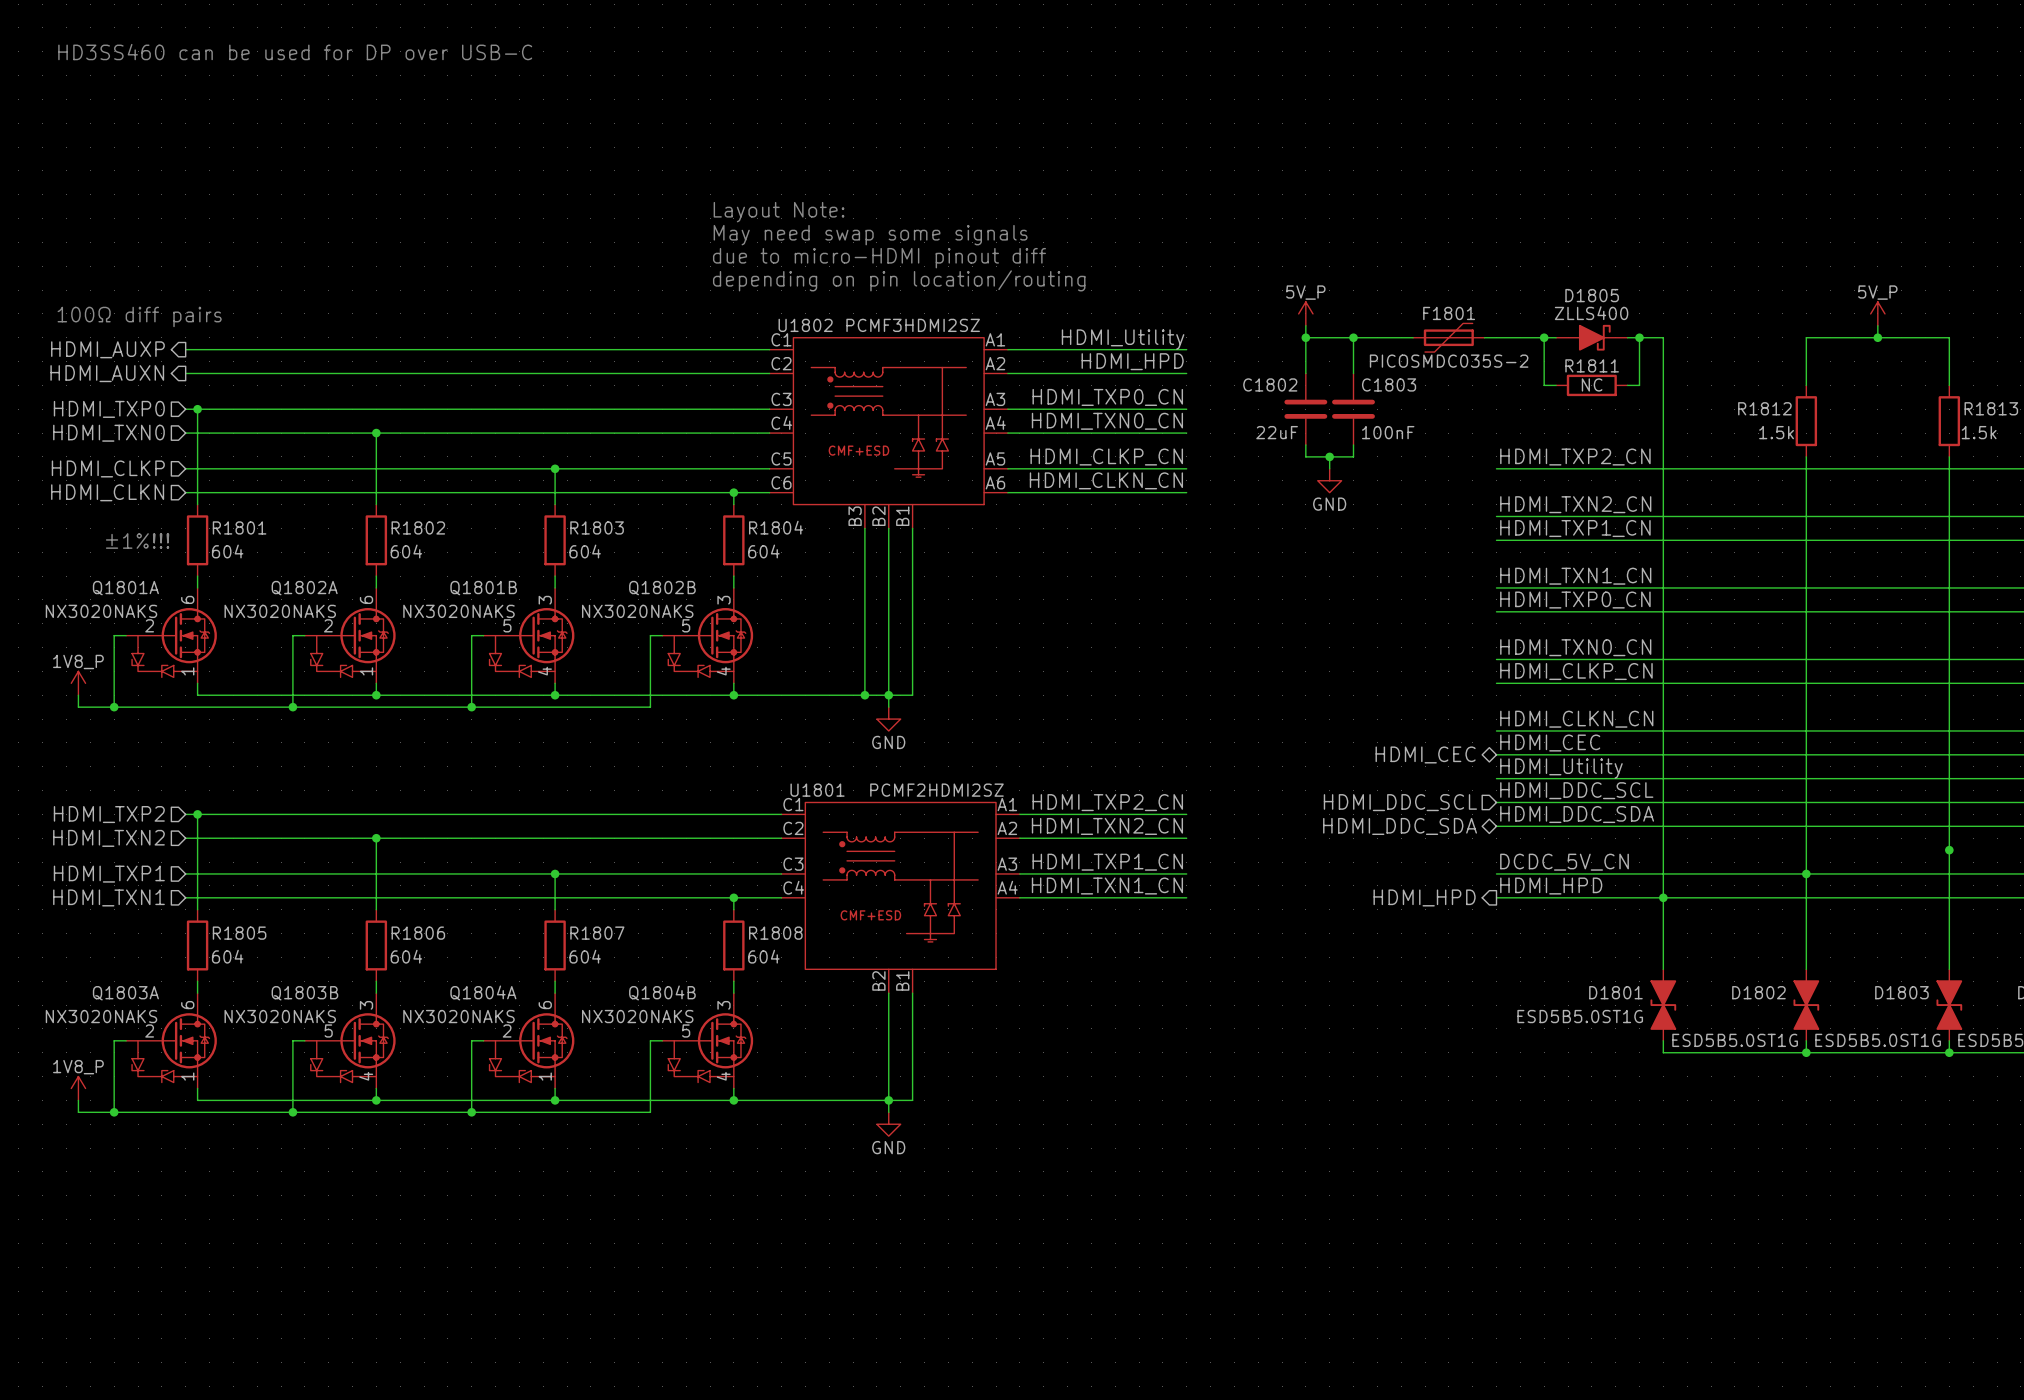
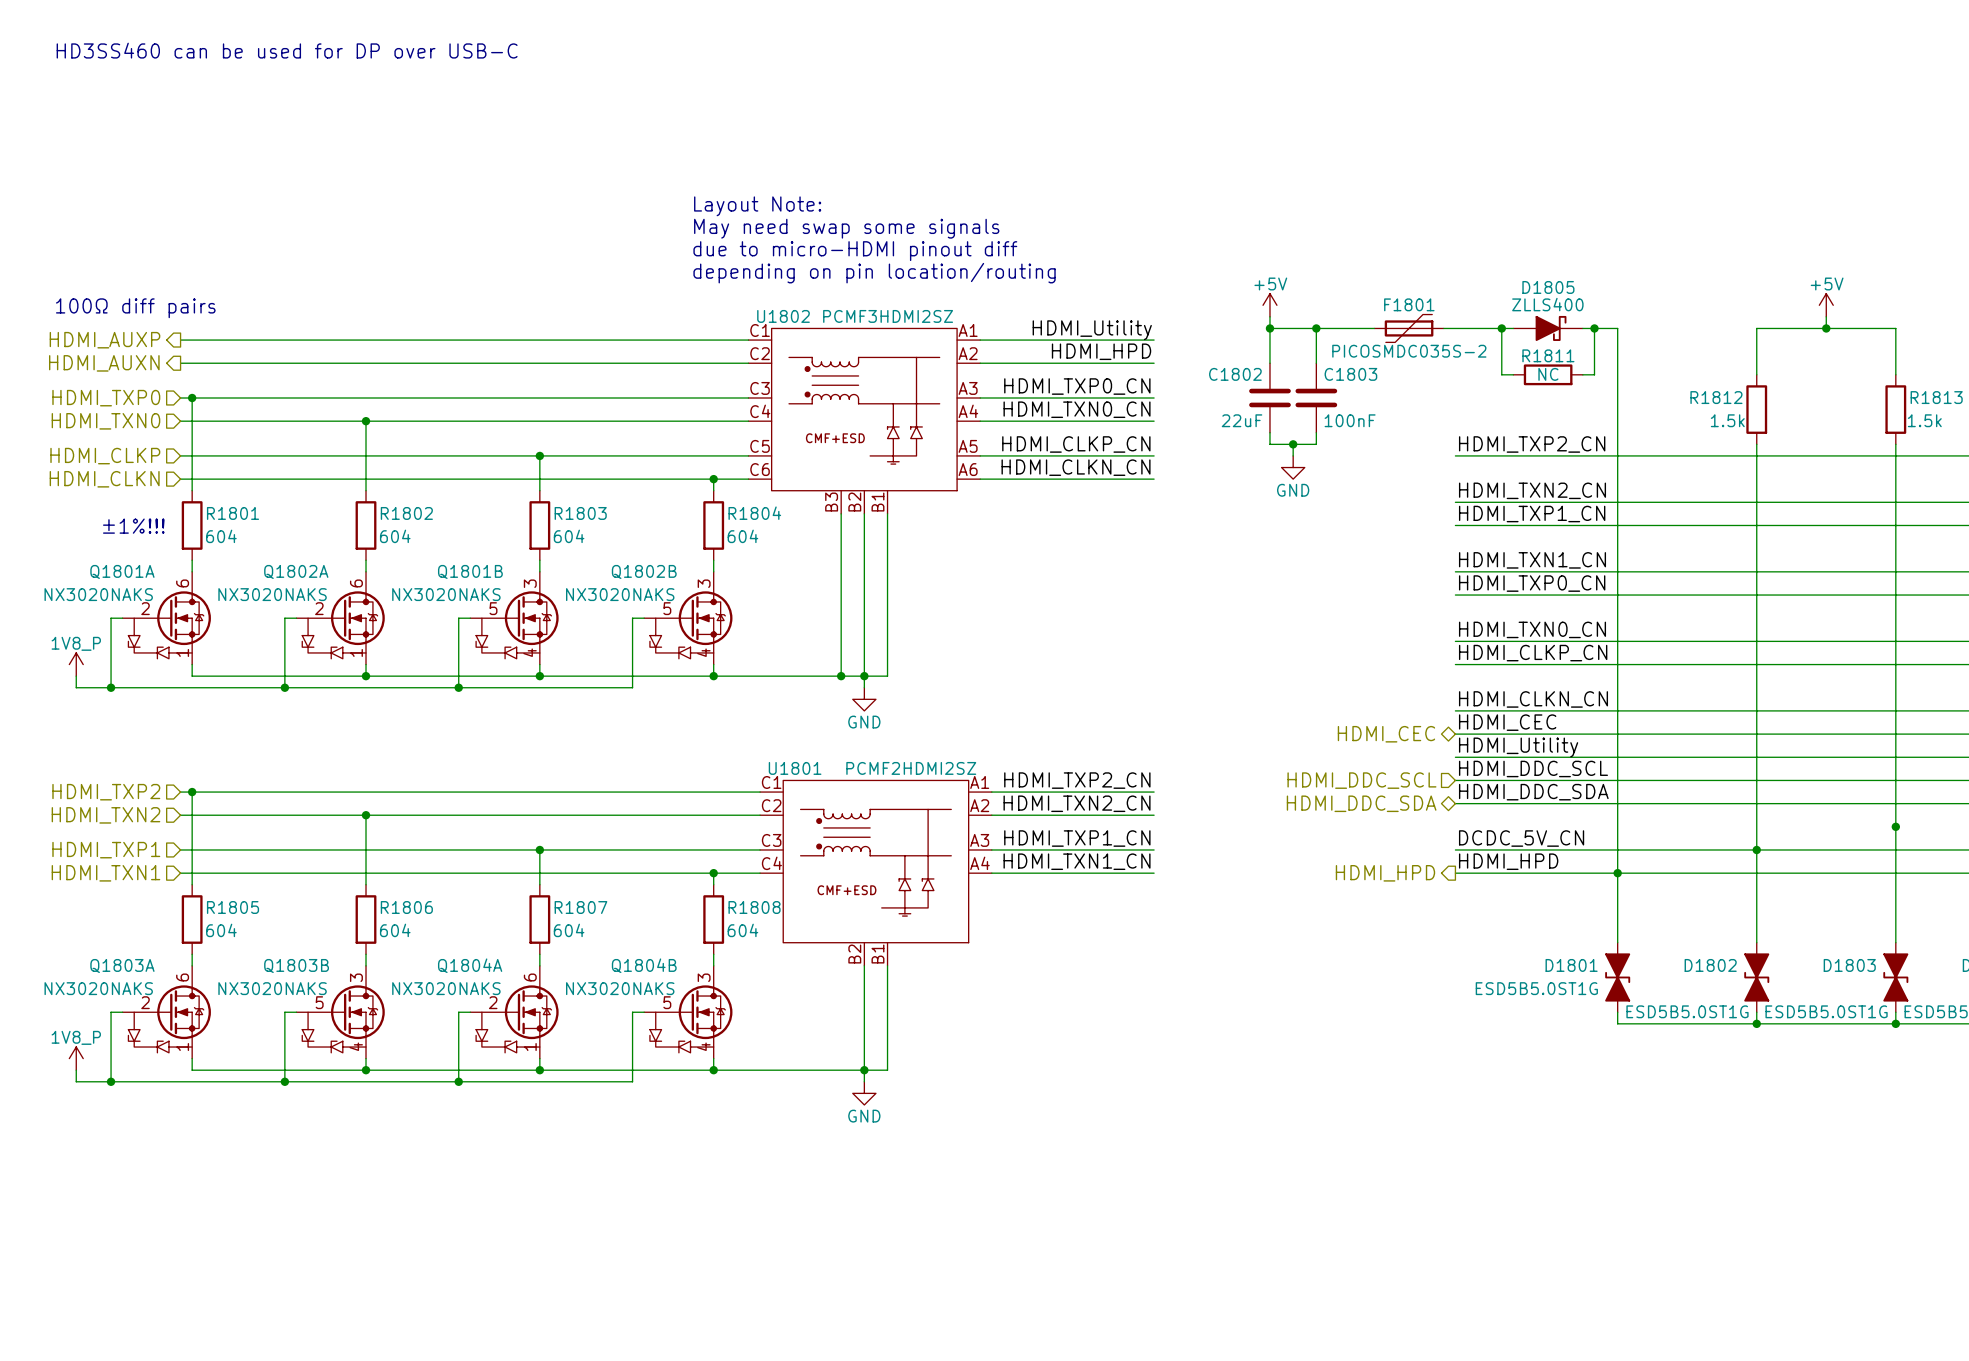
power symbol: 5V_P (1305, 313) -> +5V (1269, 305)
power symbol: 5V_P (1877, 313) -> +5V (1826, 305)

